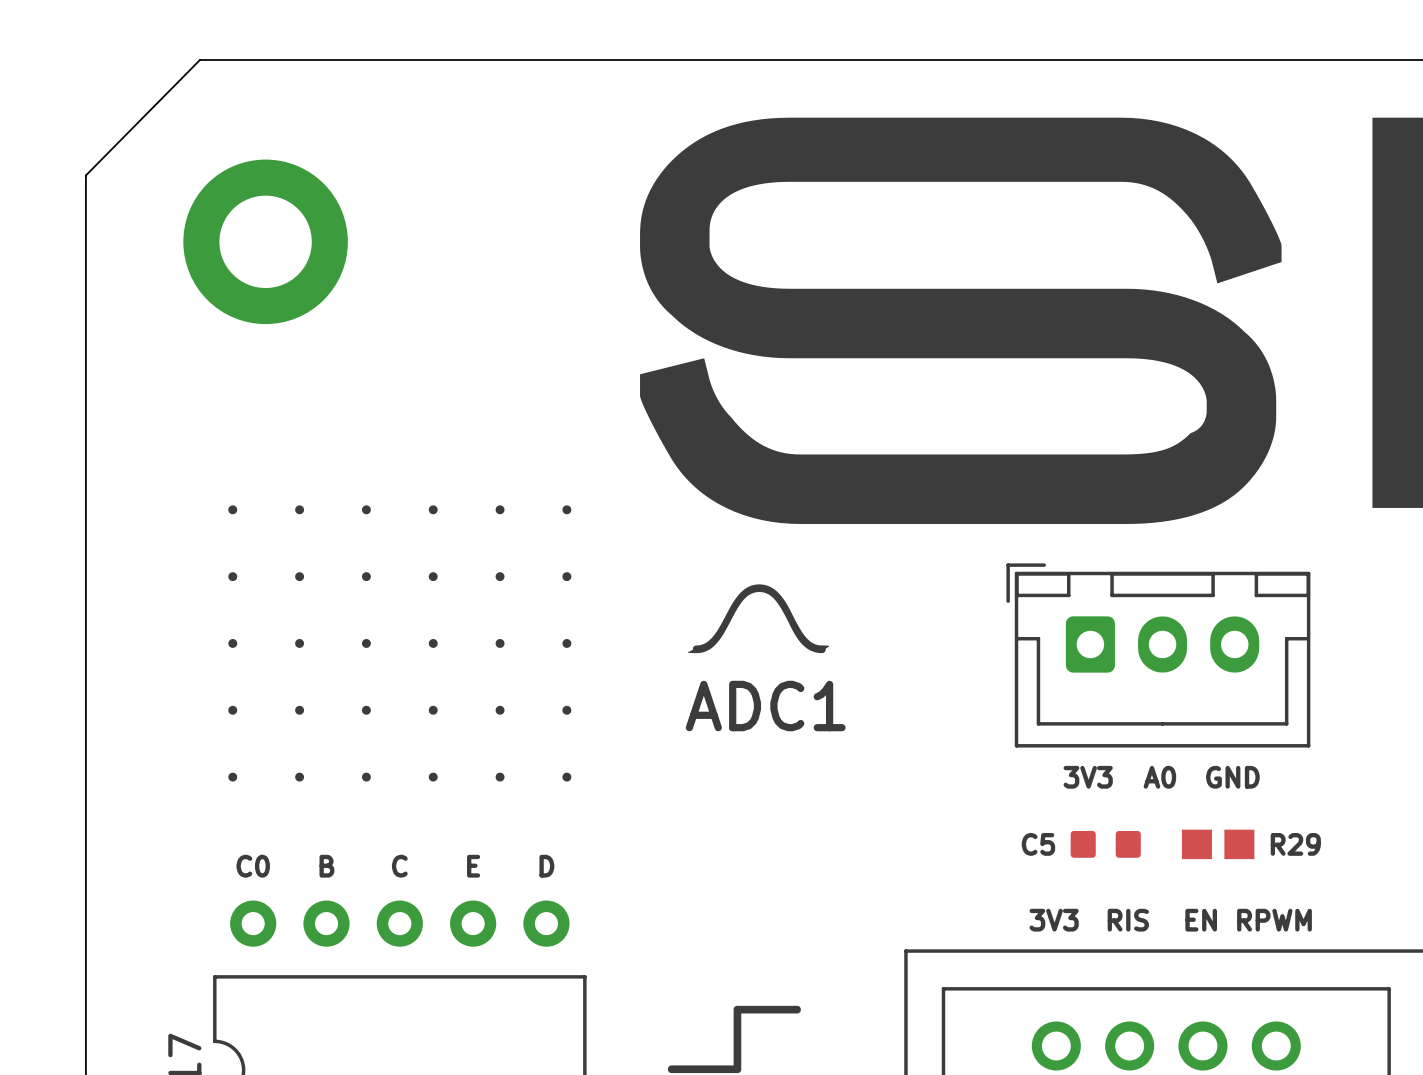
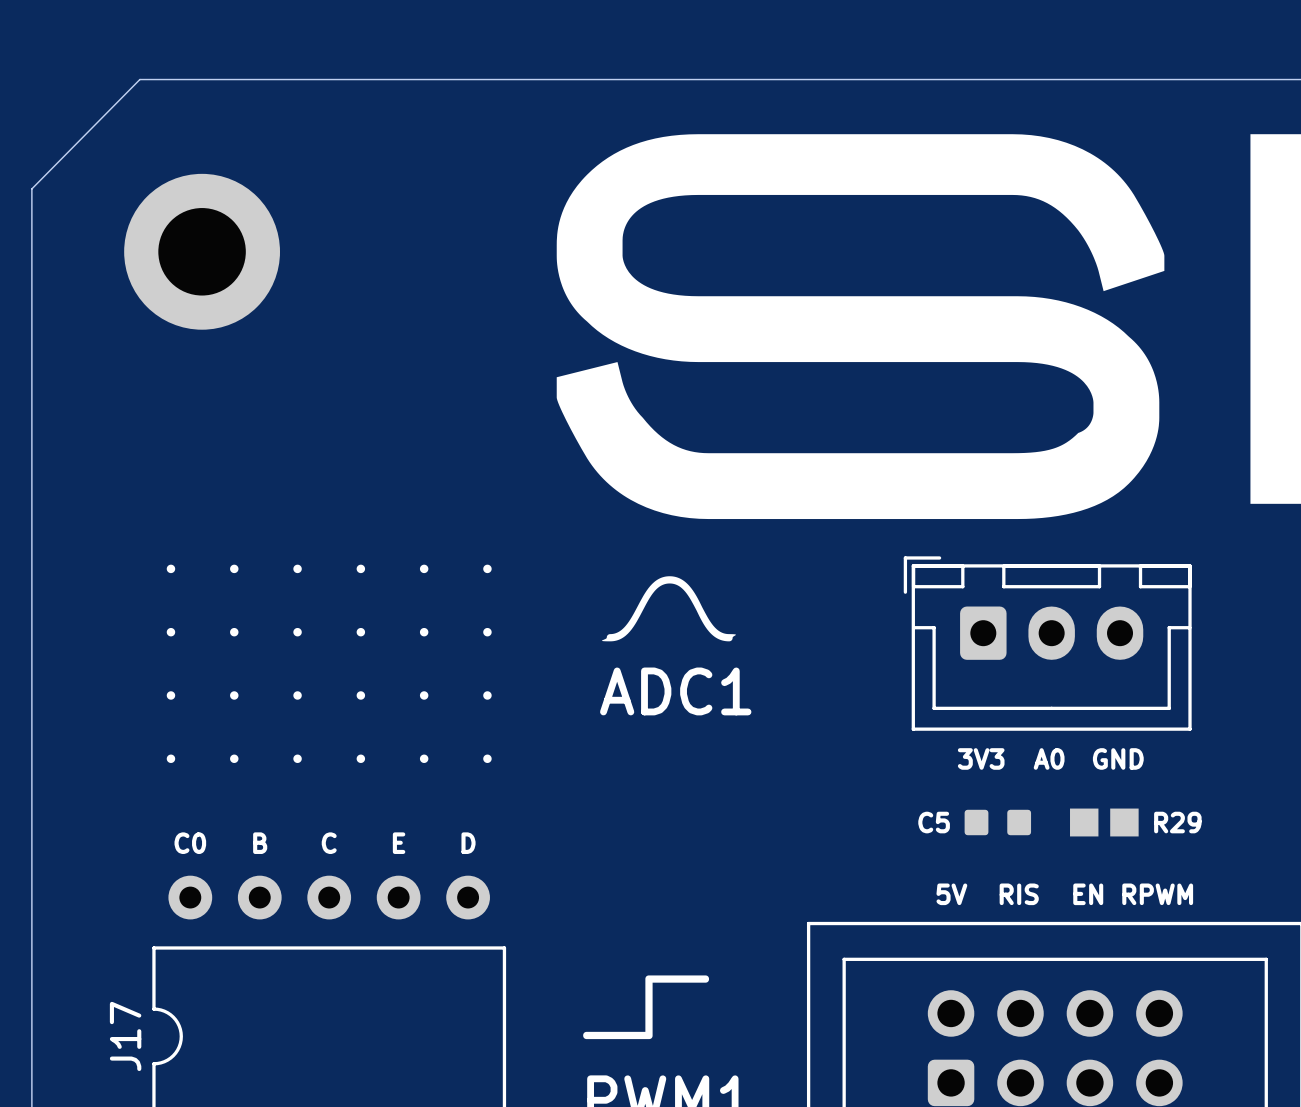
drawing: [228, 505, 238, 515] -> none
drawing: [295, 505, 305, 515] -> none
drawing: [361, 505, 371, 515] -> none
drawing: [428, 505, 438, 515] -> none
drawing: [495, 505, 505, 515] -> none
drawing: [562, 505, 572, 515] -> none
text: 3V3 (1054, 920) -> none
text: none -> 5V (951, 894)

